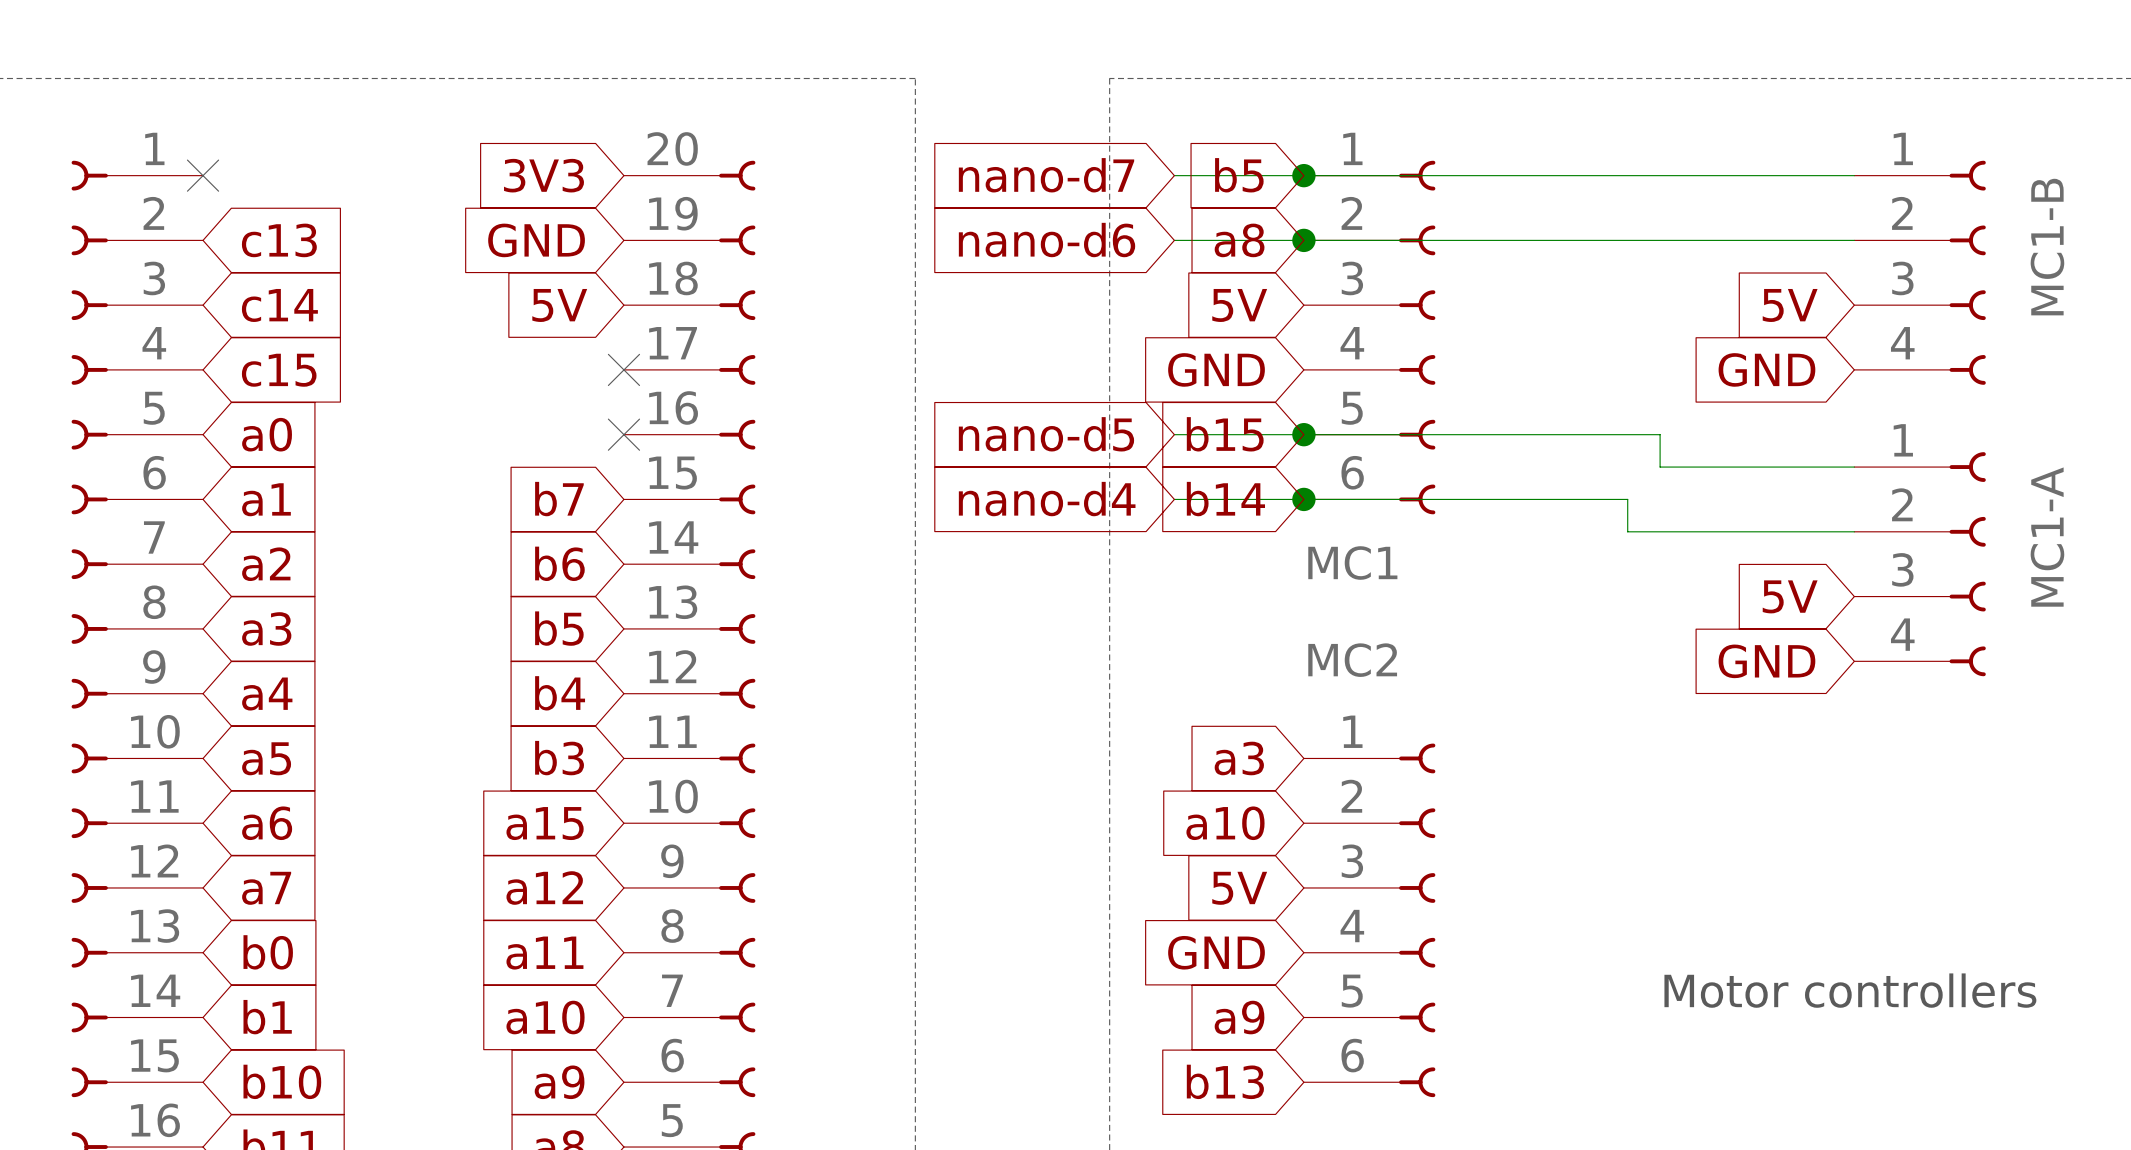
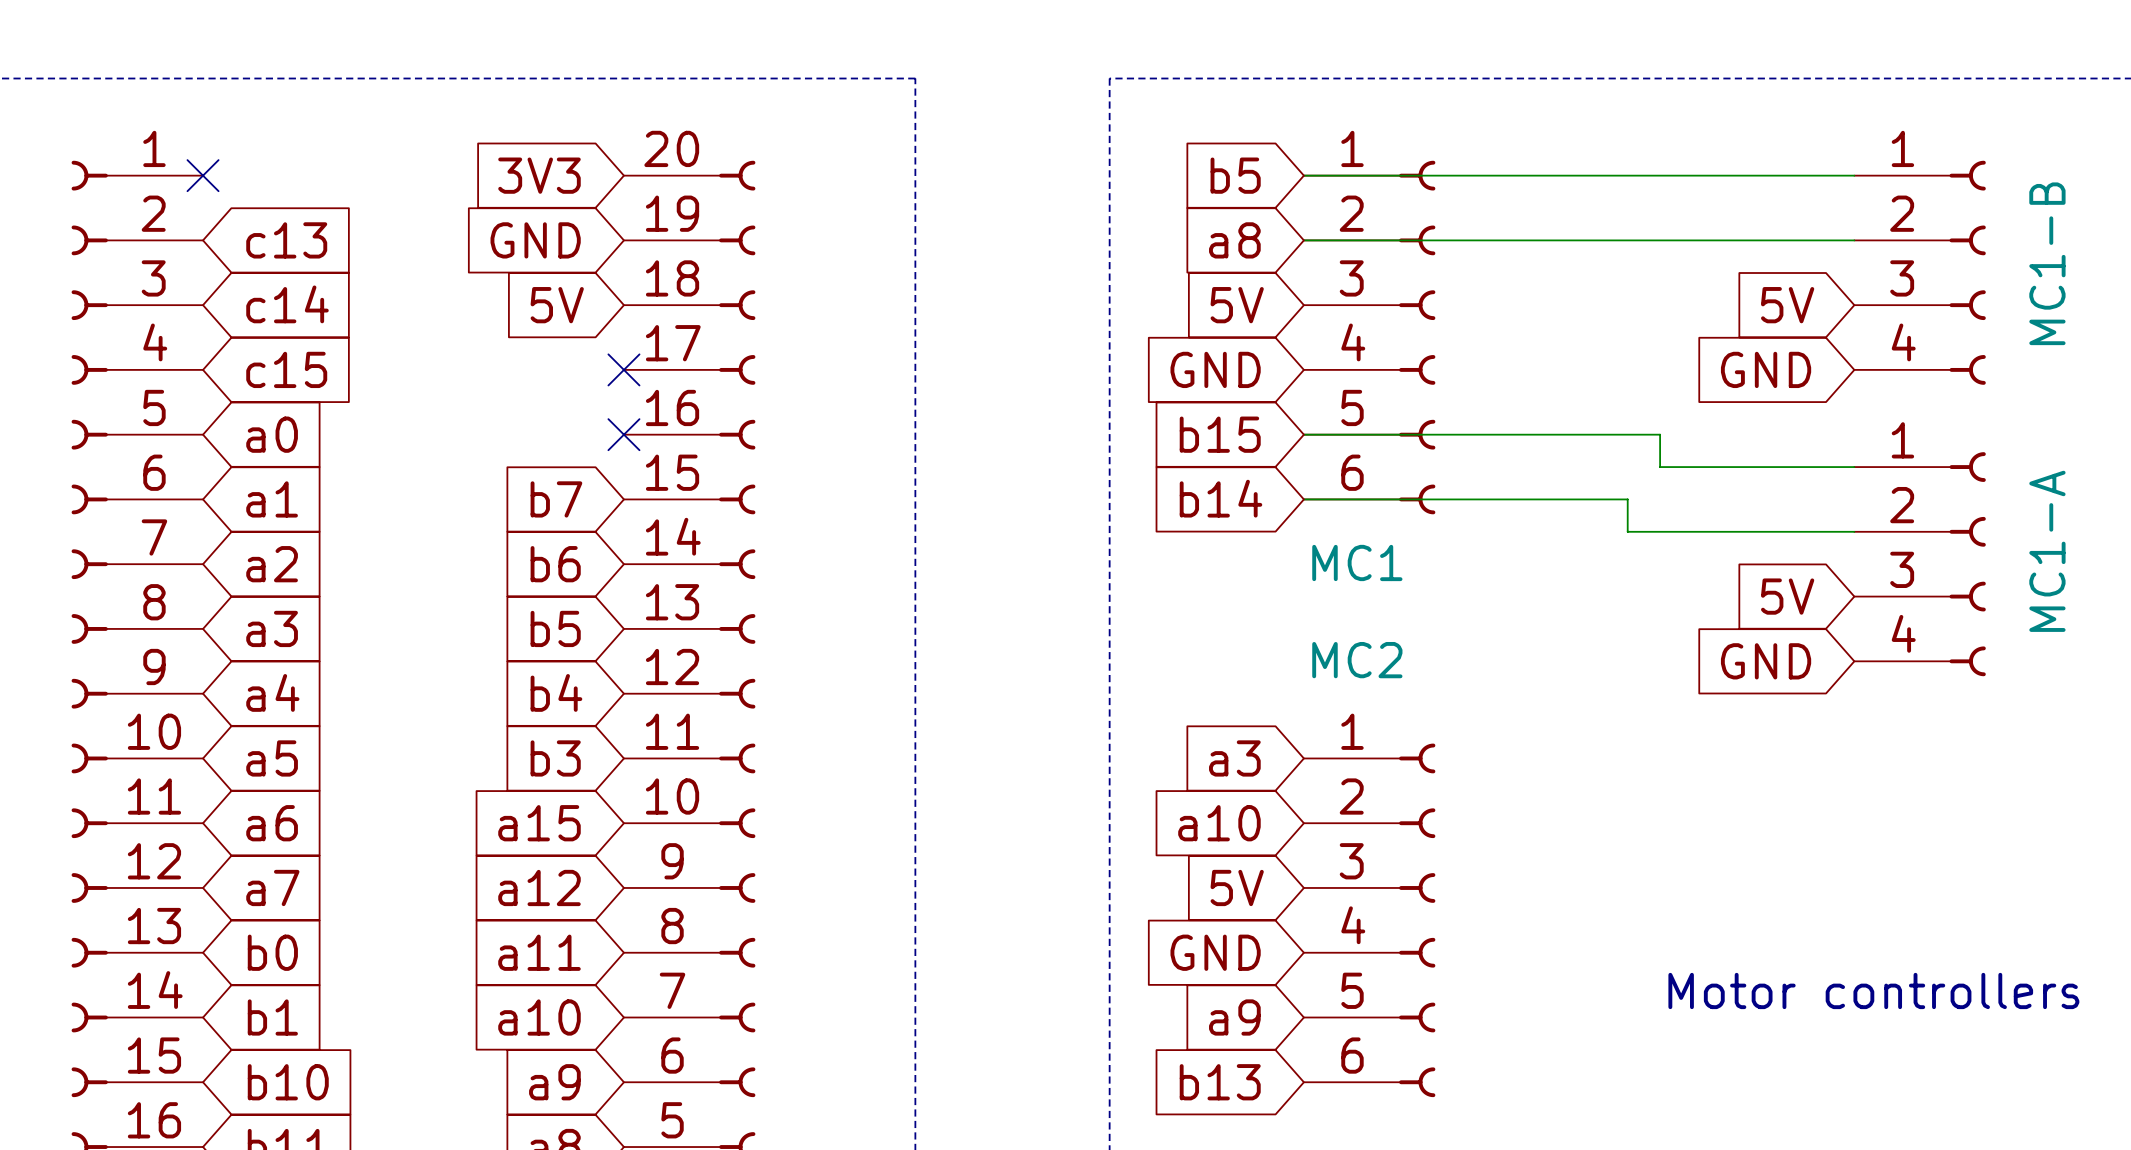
global label: nano-d7 (1046, 175) -> none
wire: (1174, 175) (1303, 175) -> none
junction: (1303, 175) -> none
global label: nano-d6 (1047, 240) -> none
wire: (1174, 240) (1303, 240) -> none
junction: (1303, 240) -> none
global label: nano-d5 (1046, 434) -> none
wire: (1174, 434) (1303, 434) -> none
junction: (1303, 434) -> none
global label: nano-d4 (1047, 499) -> none
wire: (1174, 499) (1303, 499) -> none
junction: (1303, 499) -> none

